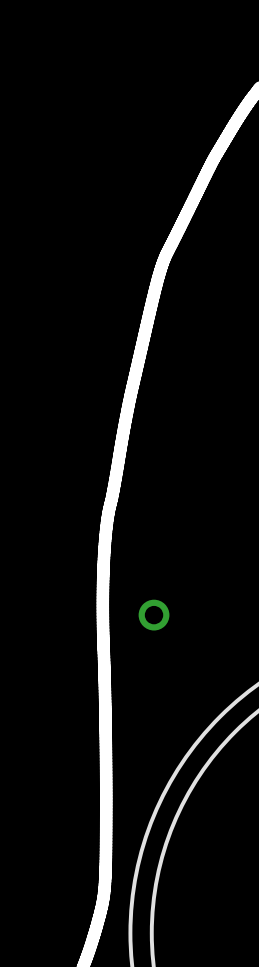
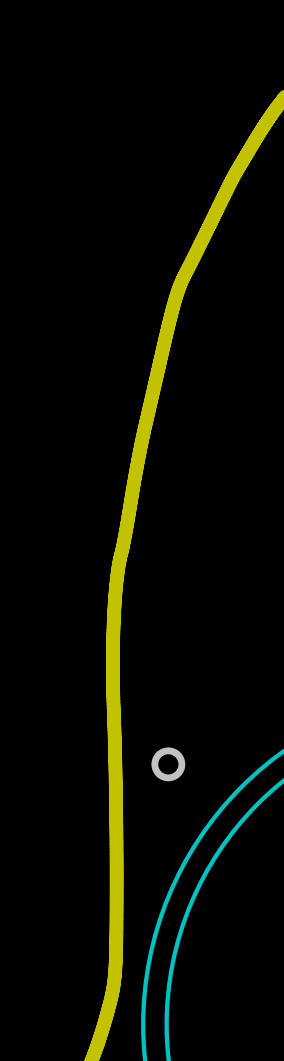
via position: (154, 615) -> (168, 764)

